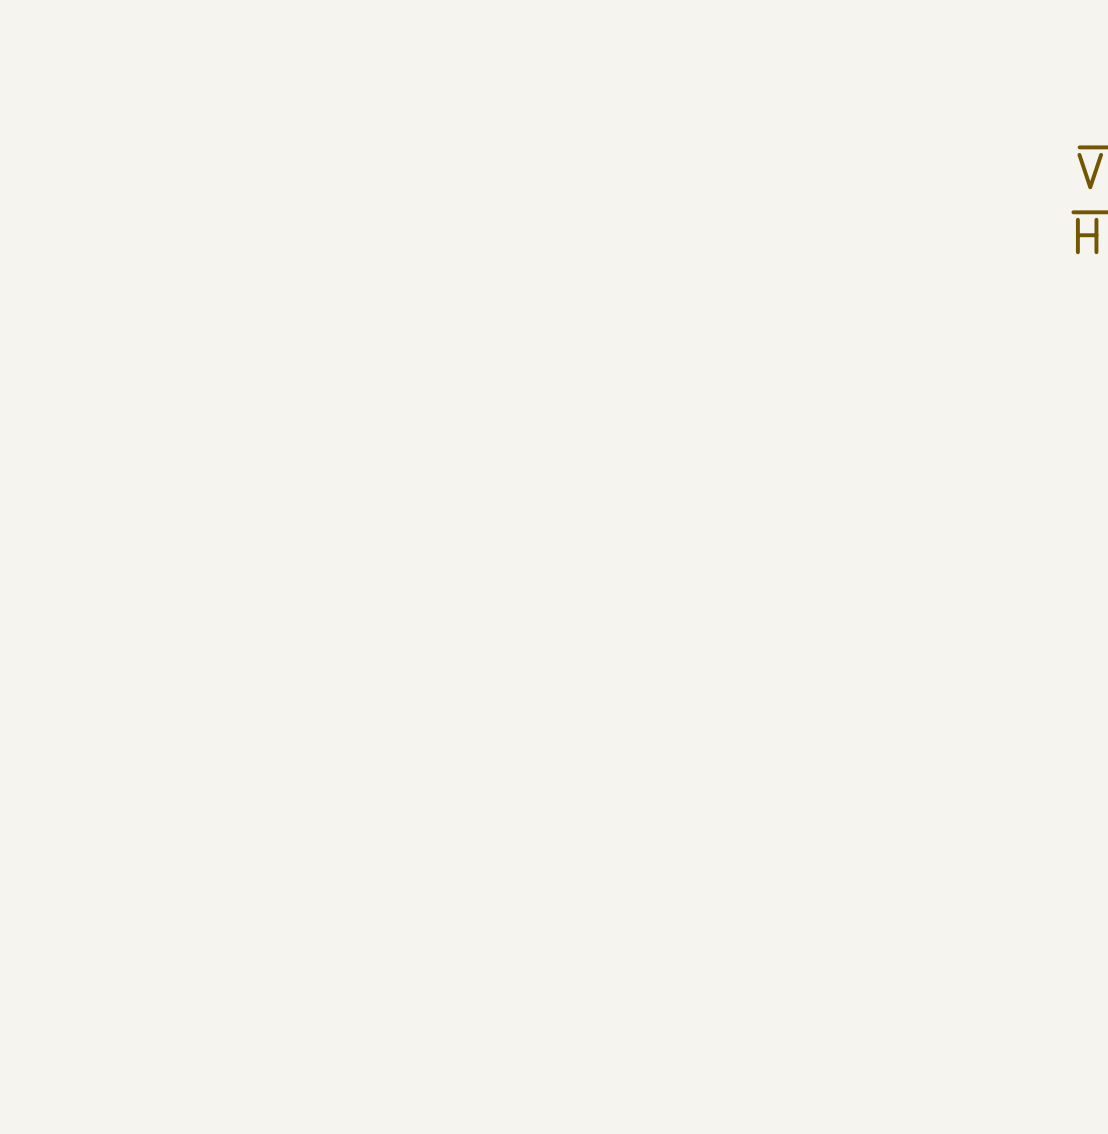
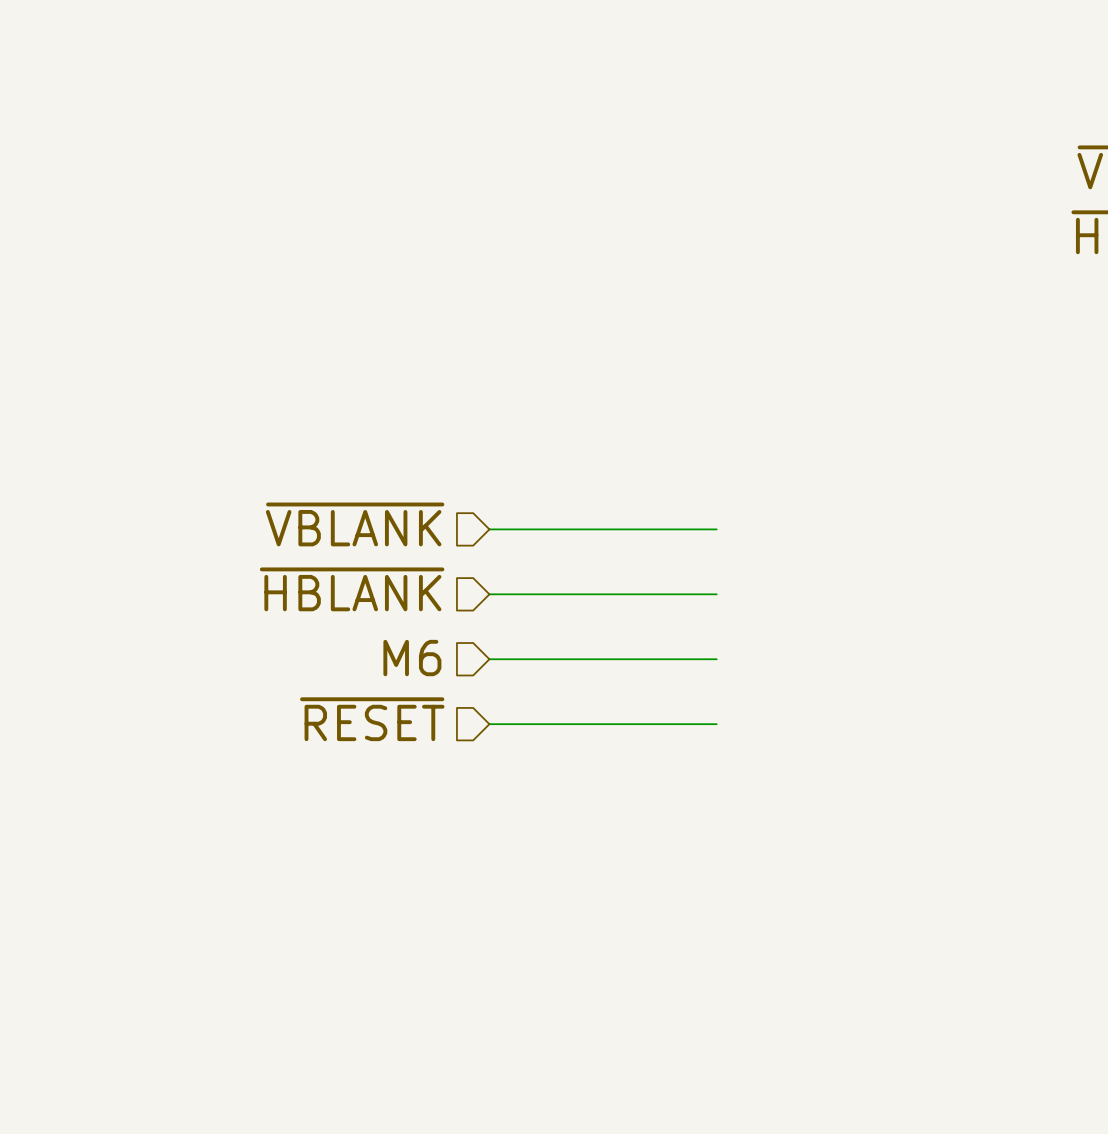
hierarchical label: none -> ~{VBLANK} (355, 524)
wire: none -> (489, 529) (716, 529)
hierarchical label: none -> ~{HBLANK} (352, 589)
wire: none -> (489, 594) (716, 594)
hierarchical label: none -> M6 (412, 658)
wire: none -> (489, 659) (716, 659)
hierarchical label: none -> ~{RESET} (372, 719)
wire: none -> (489, 724) (716, 724)

